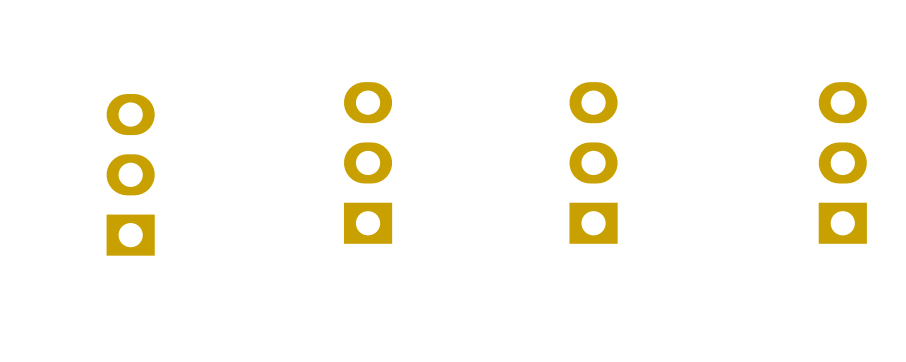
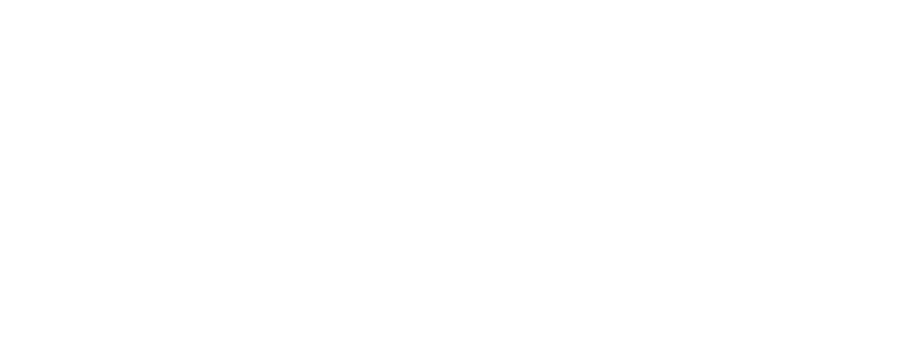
part: (368, 162) -> none
part: (593, 162) -> none
part: (842, 162) -> none
part: (130, 174) -> none

